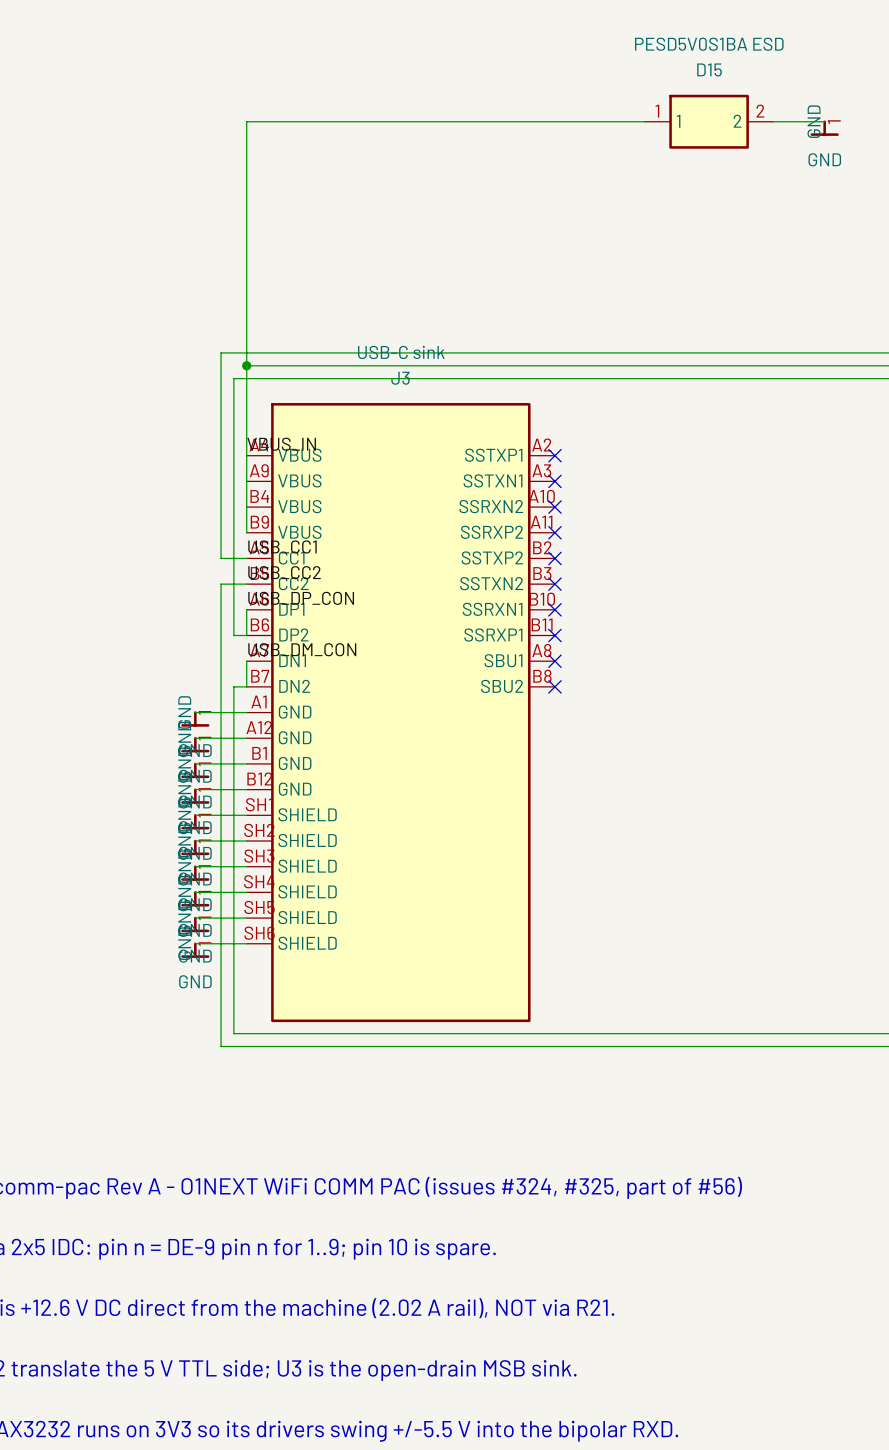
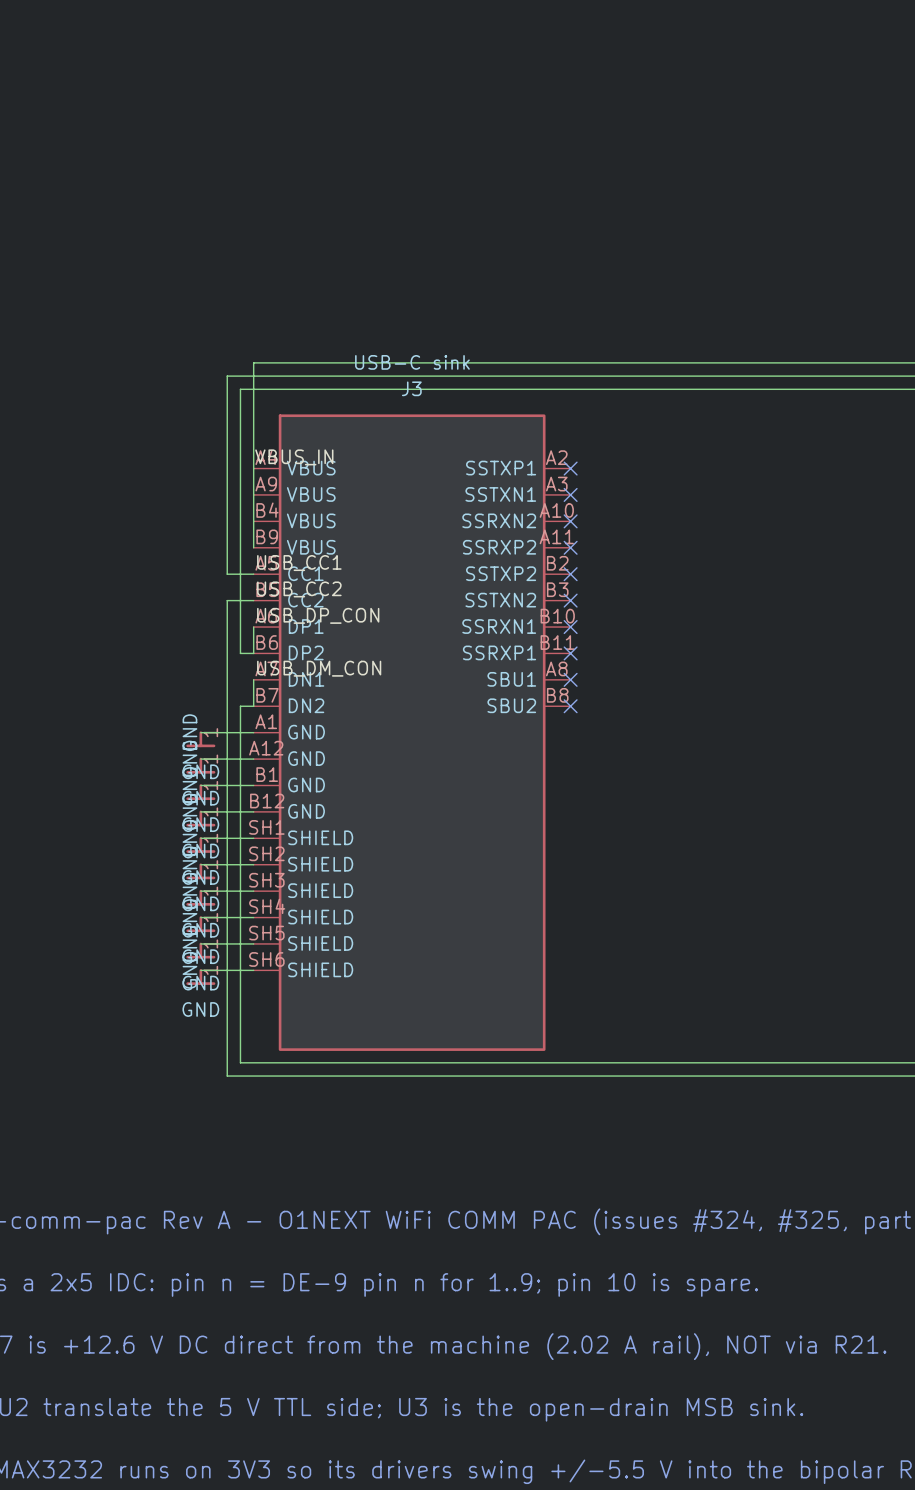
wire: (644, 121) (246, 121) (246, 352) (221, 352) (221, 365) -> (253, 376) (227, 376)
D15: PESD5V0S1BA ESD (709, 121) -> none
wire: (773, 121) (824, 121) -> none
power symbol: GND (824, 128) -> none
junction: (246, 365) -> none

